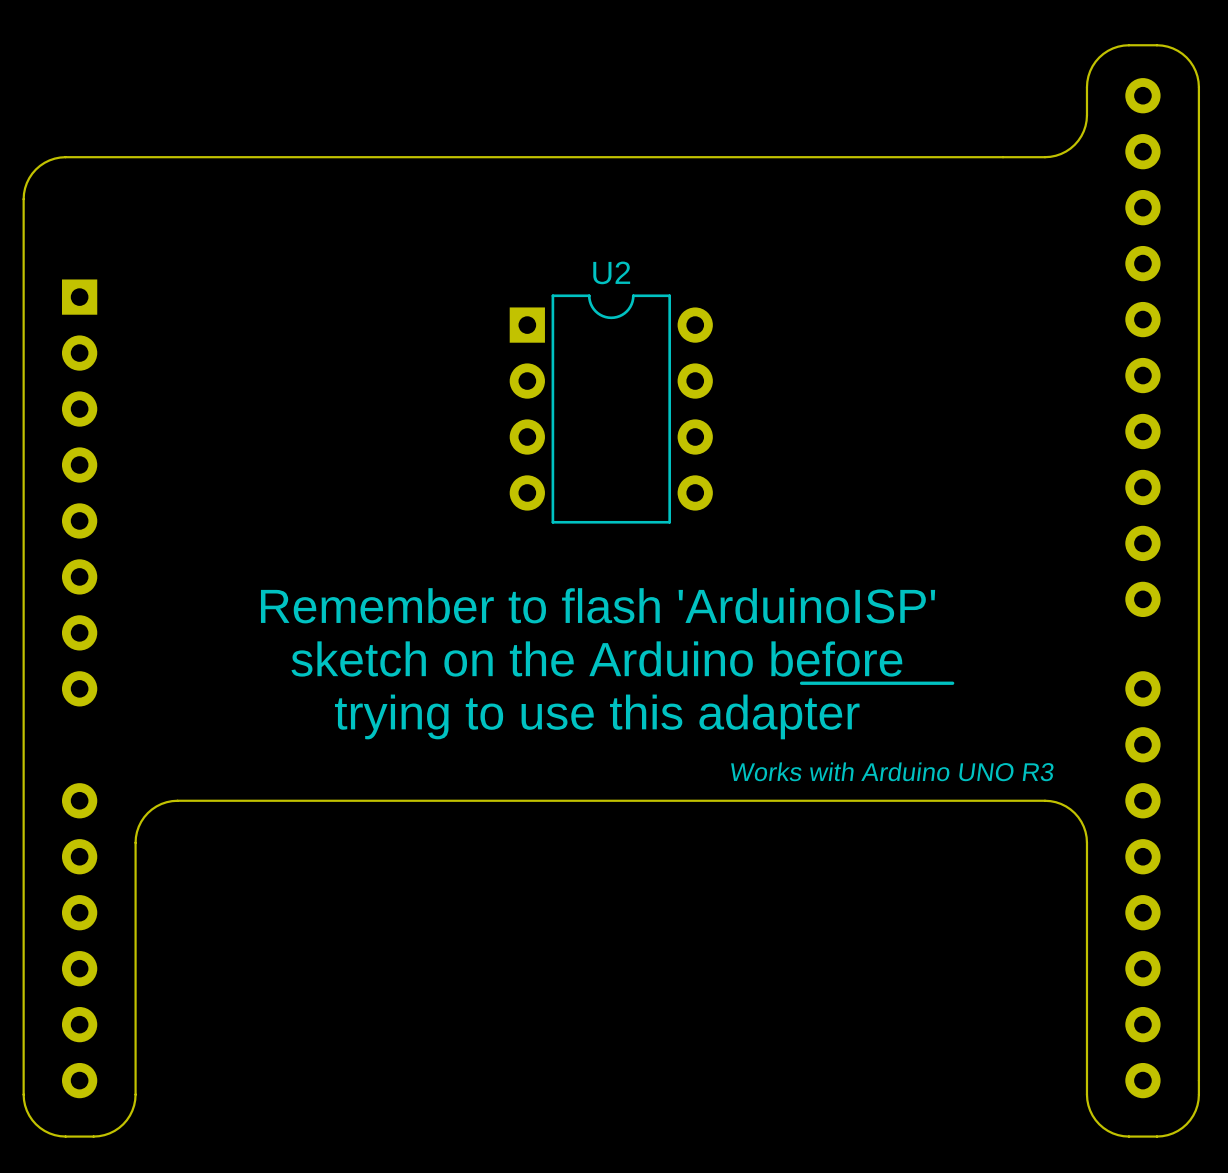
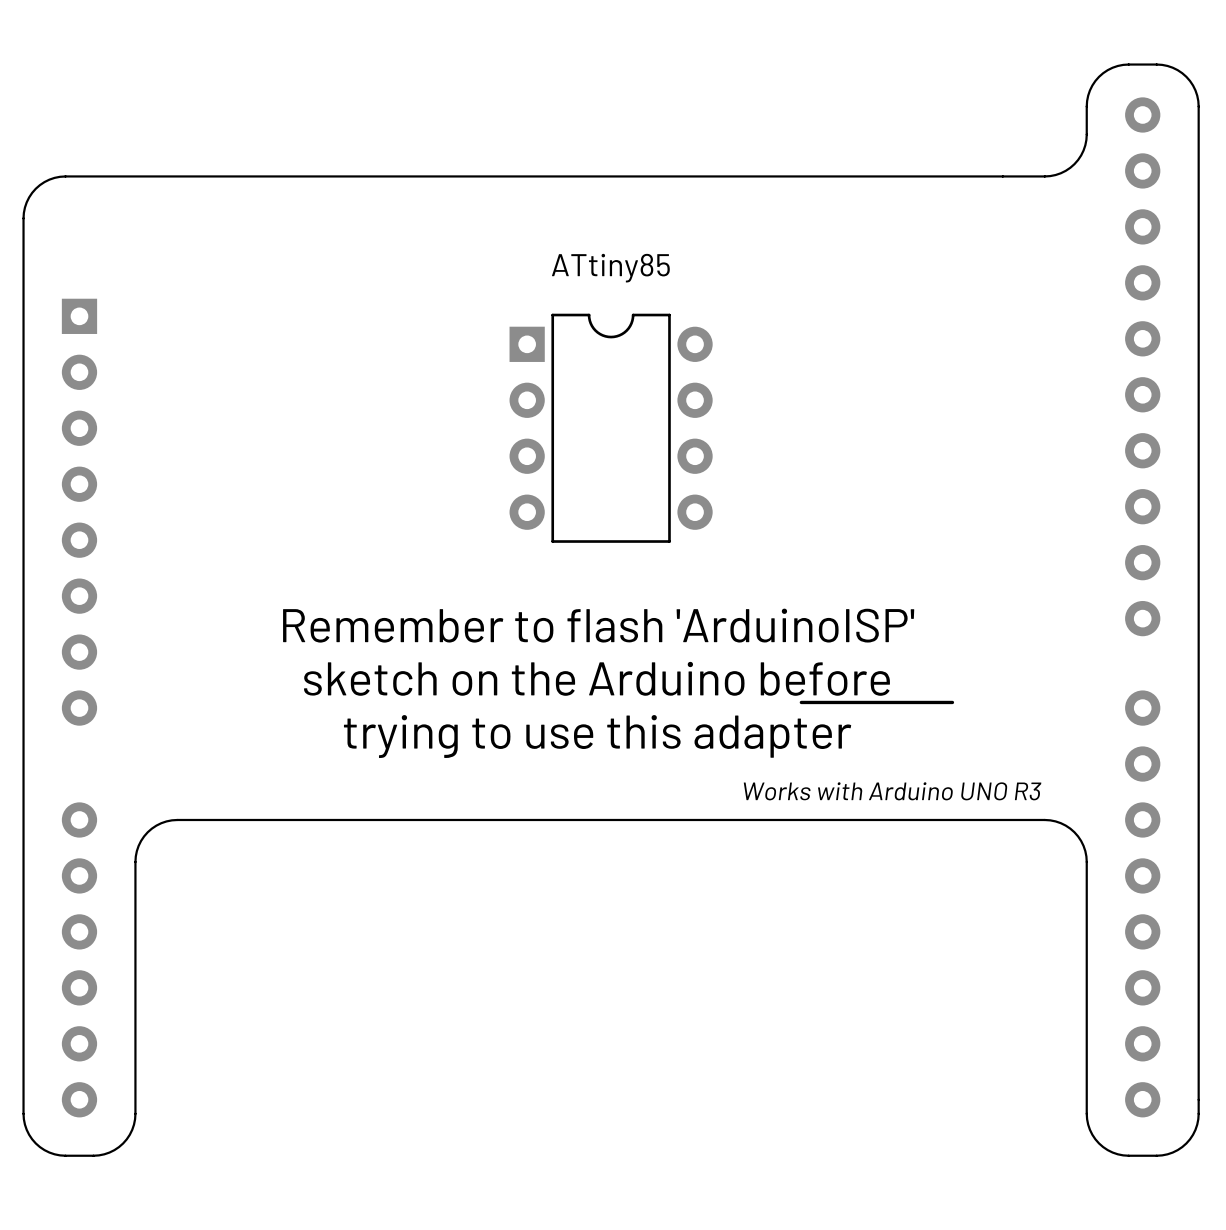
U2 value: none -> ATtiny85 (610, 268)
U2 name: U2 (611, 272) -> none

